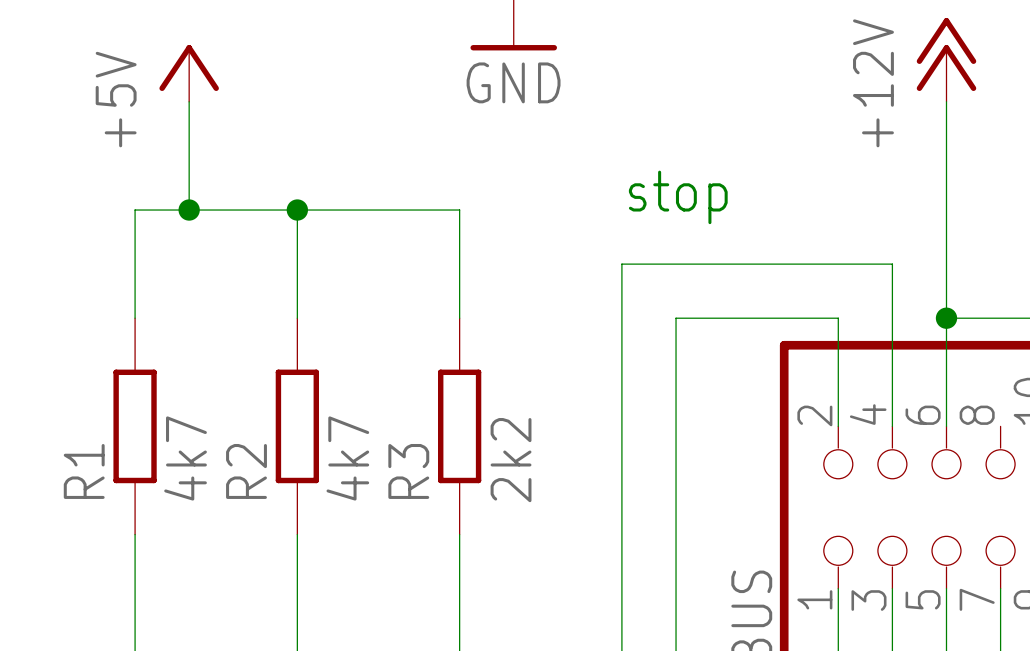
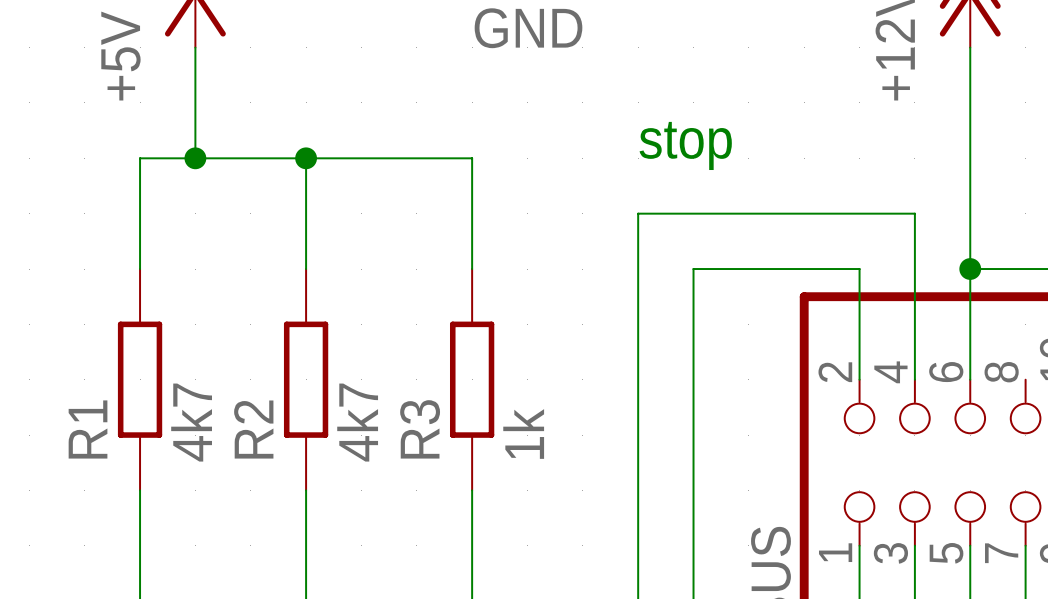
R3 value: 2k2 (511, 460) -> 1k (523, 433)

